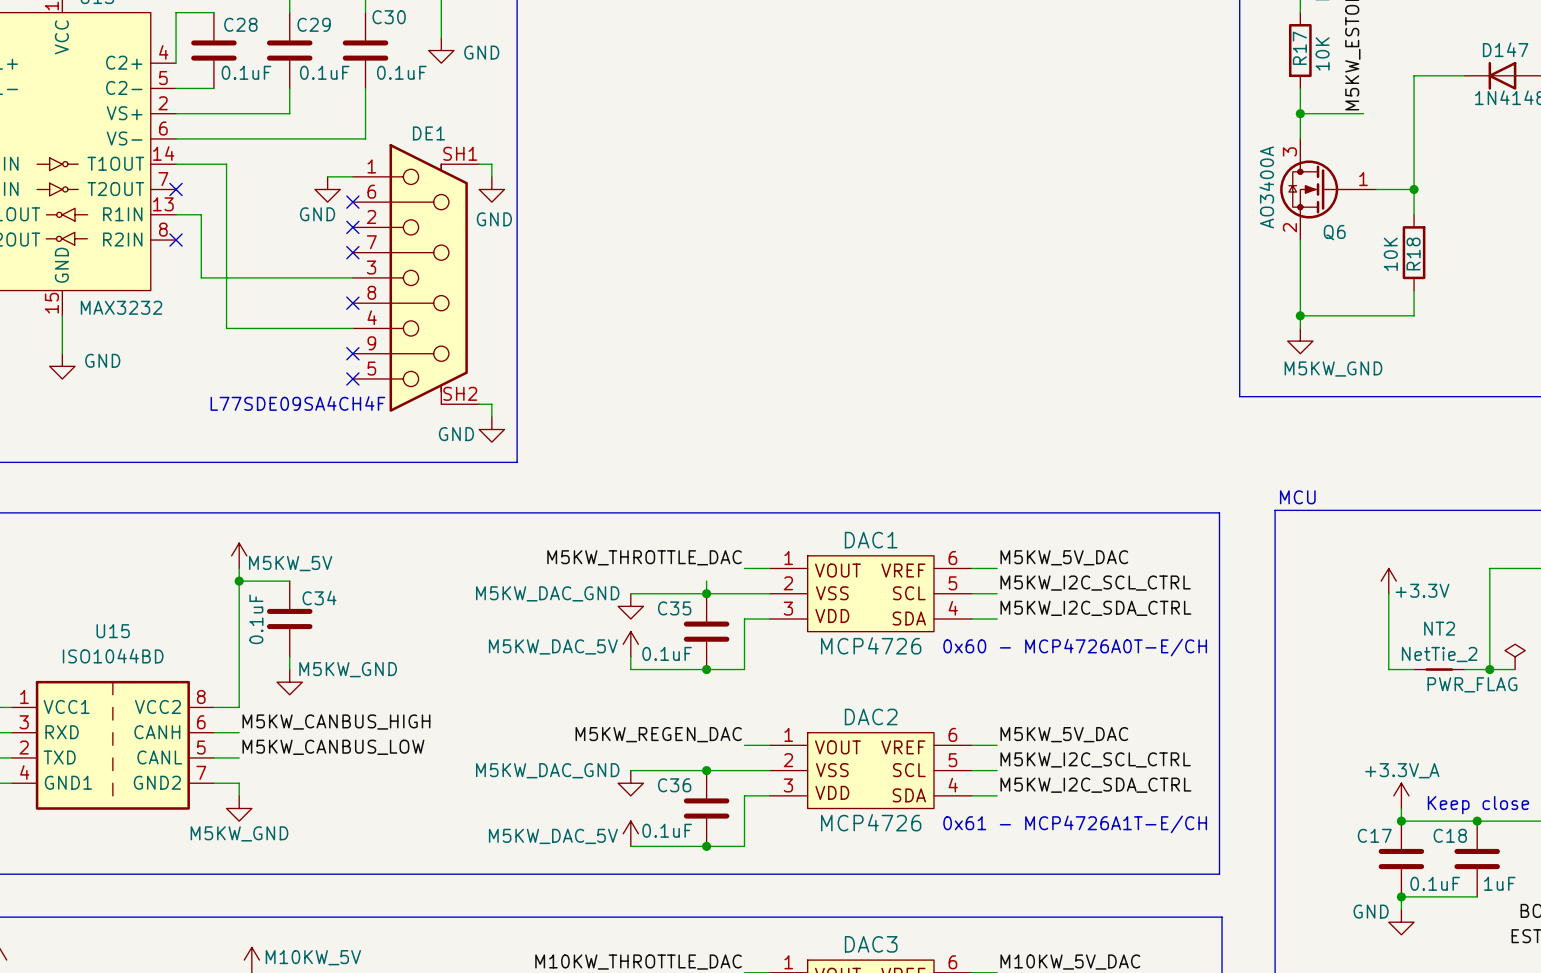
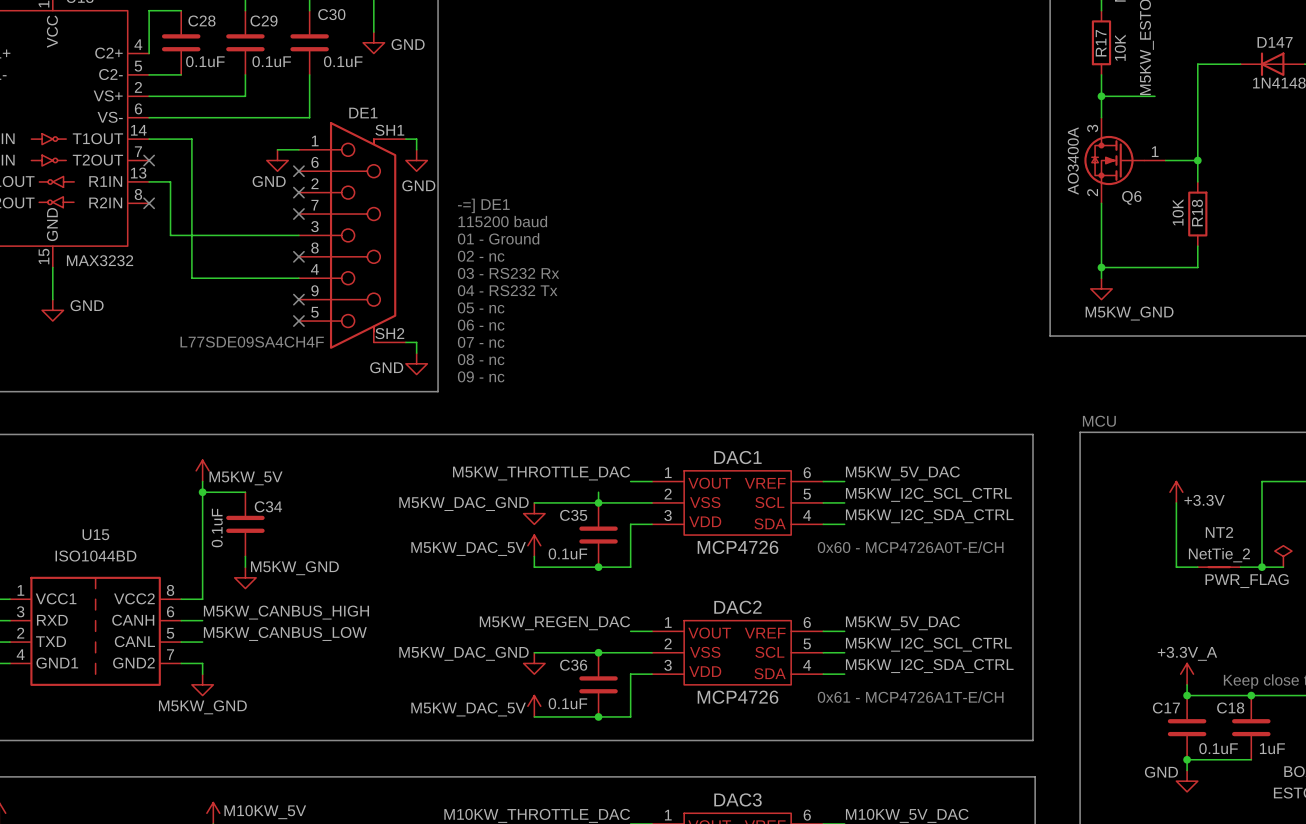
text: none -> -=] DE1 (483, 205)
text: none -> 115200 baud (502, 221)
text: none -> 01 - Ground (498, 238)
text: none -> 02 - nc (481, 256)
text: none -> 03 - RS232 Rx (508, 273)
text: none -> 04 - RS232 Tx (507, 290)
text: none -> 05 - nc (481, 307)
text: none -> 06 - nc (481, 325)
text: none -> 07 - nc (481, 342)
text: none -> 08 - nc (481, 359)
text: none -> 09 - nc (481, 376)

